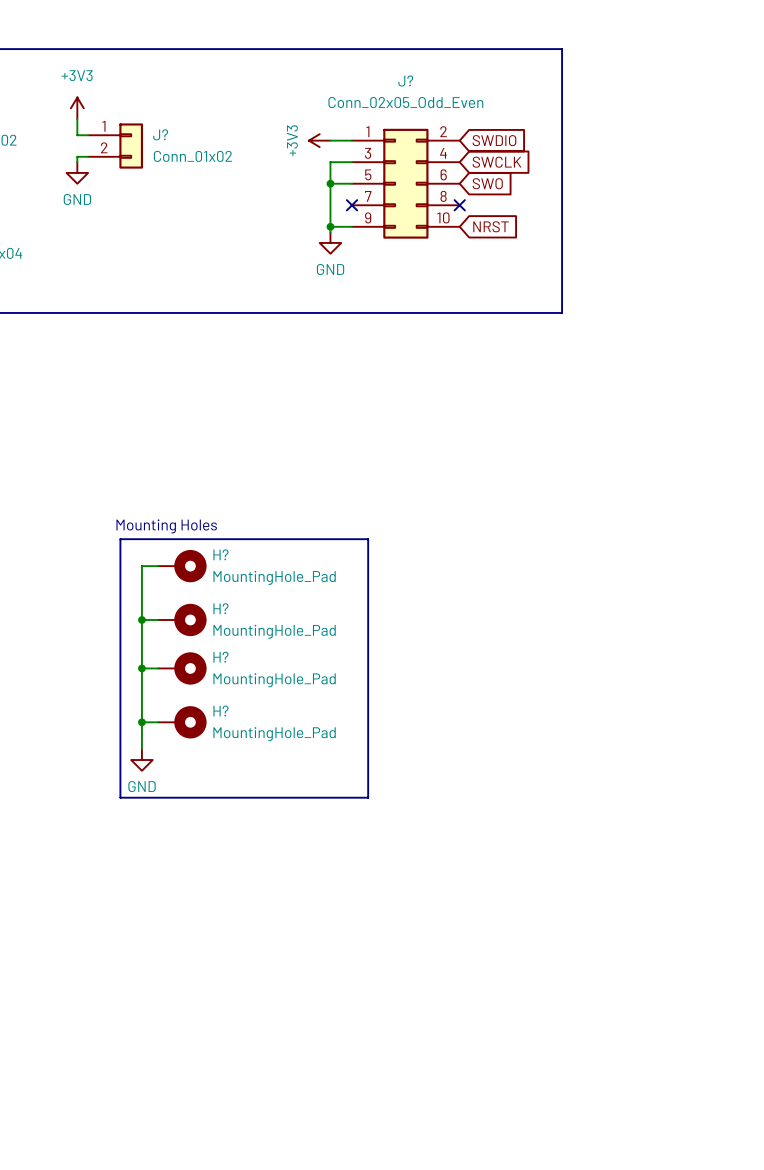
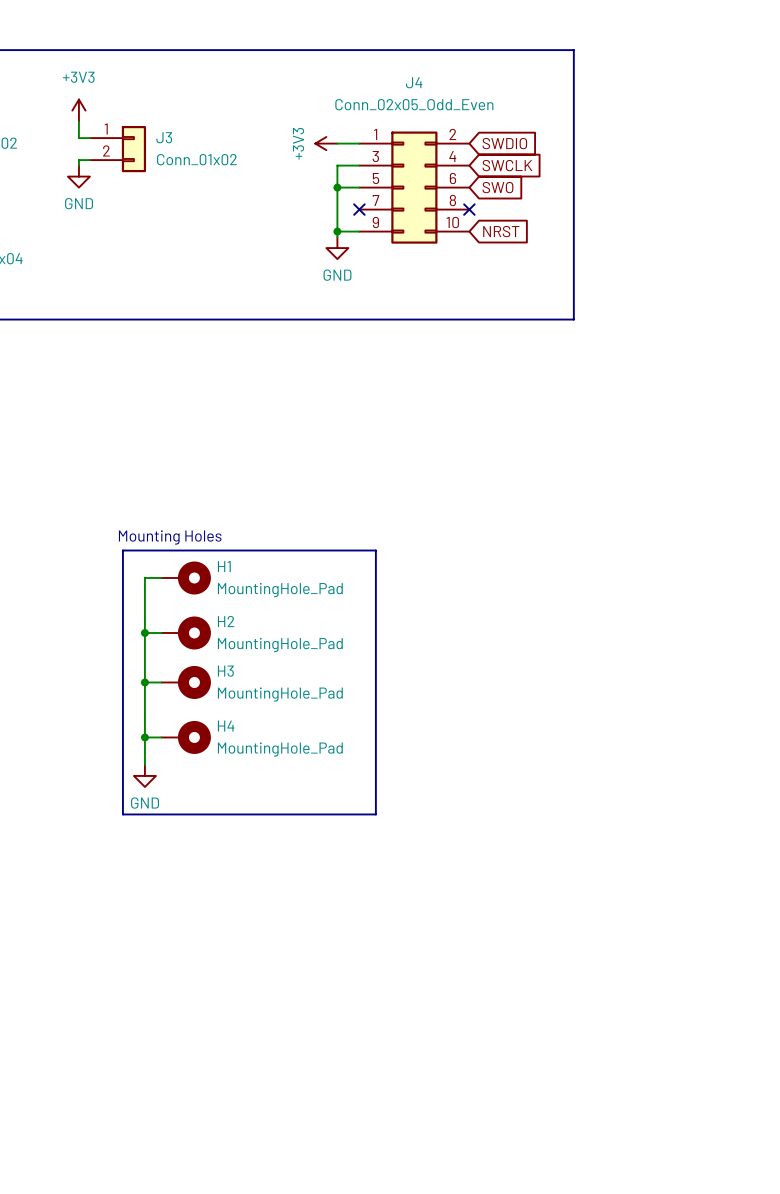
J? name: J? (405, 80) -> J4 (414, 82)
J? name: J? (160, 134) -> J3 (164, 137)
H? name: H? (220, 554) -> H1 (224, 566)
H? name: H? (220, 608) -> H2 (226, 621)
H? name: H? (220, 657) -> H3 (225, 671)
H? name: H? (220, 711) -> H4 (226, 726)

